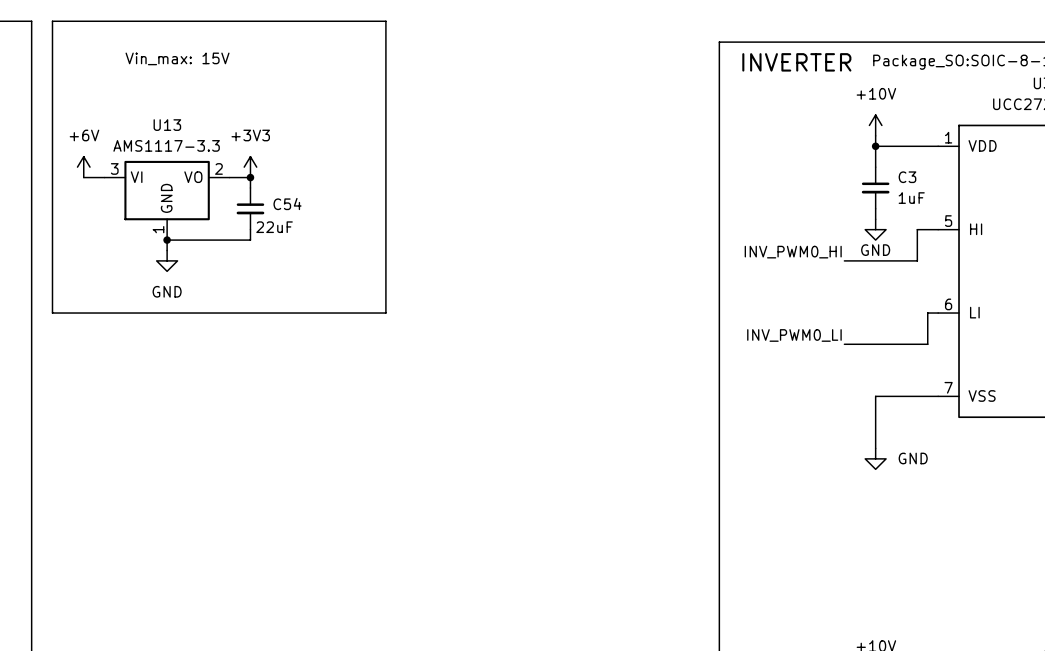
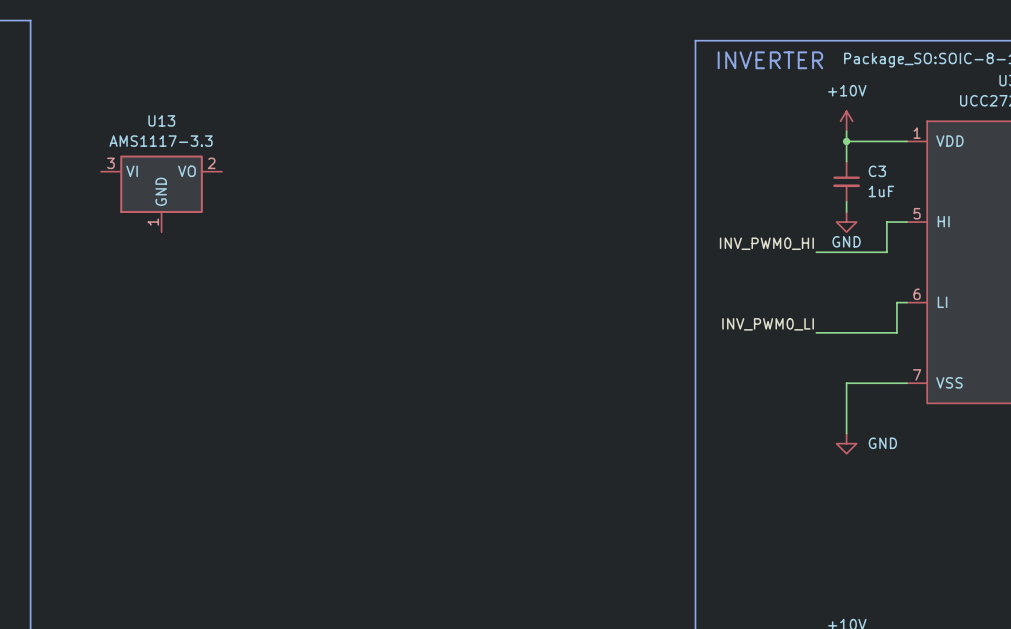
line: (52, 21) (385, 21) (385, 313) (52, 313) (52, 21) -> none
text: Vin_max: 15V (177, 58) -> none
power symbol: +6V (83, 167) -> none
power symbol: +3V3 (250, 167) -> none
wire: (83, 177) (104, 177) -> none
wire: (229, 177) (250, 177) (250, 187) -> none
junction: (250, 177) -> none
C54: 22uF (250, 208) -> none
wire: (250, 229) (250, 240) (167, 240) (167, 250) -> none
junction: (167, 240) -> none
power symbol: GND (167, 260) -> none

